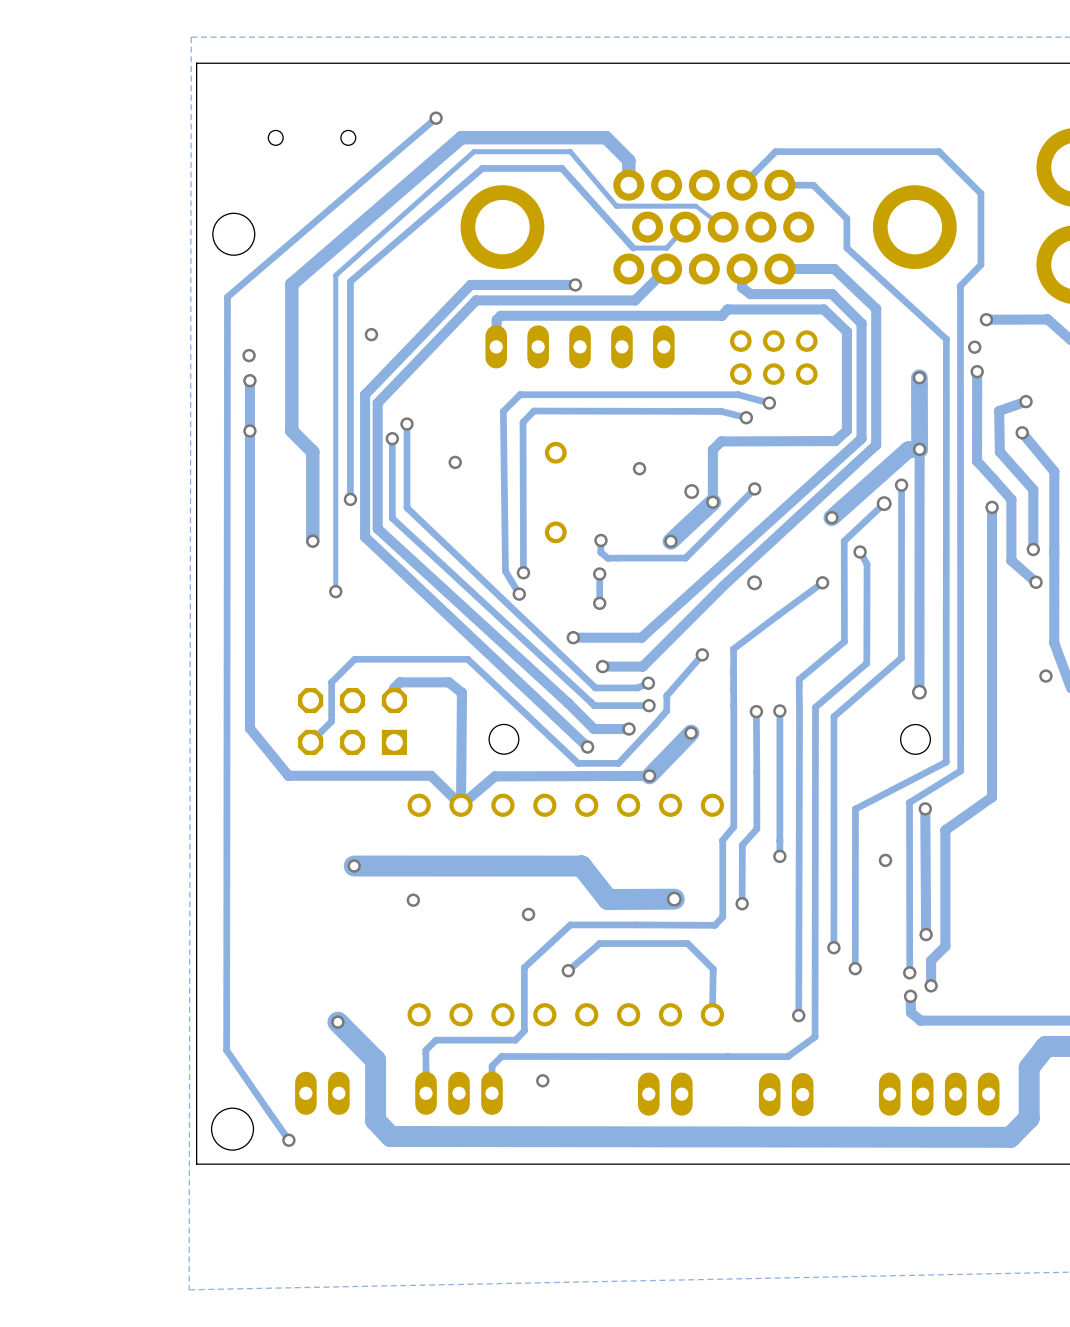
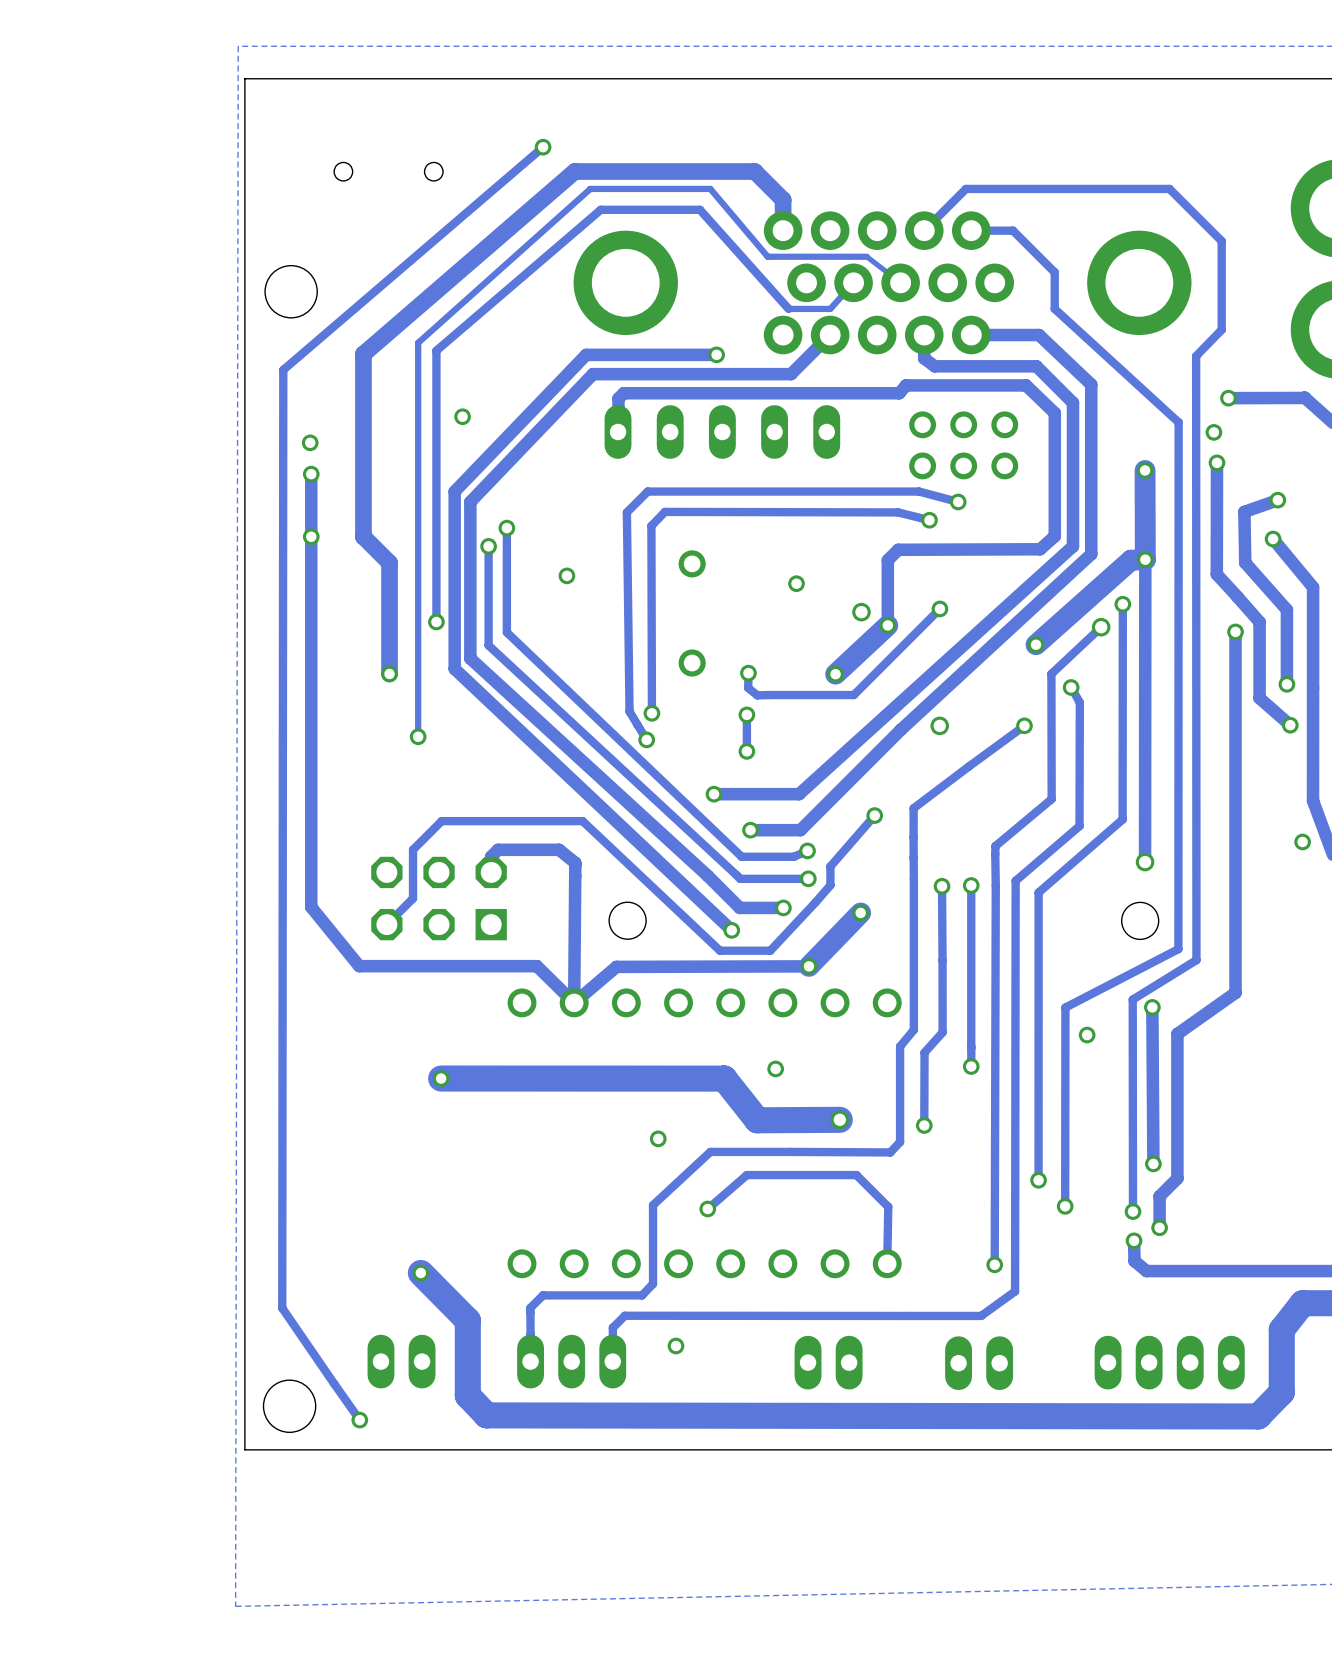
via: none -> (775, 1068)
via position: (885, 860) -> (1087, 1035)
via: (413, 900) -> none

